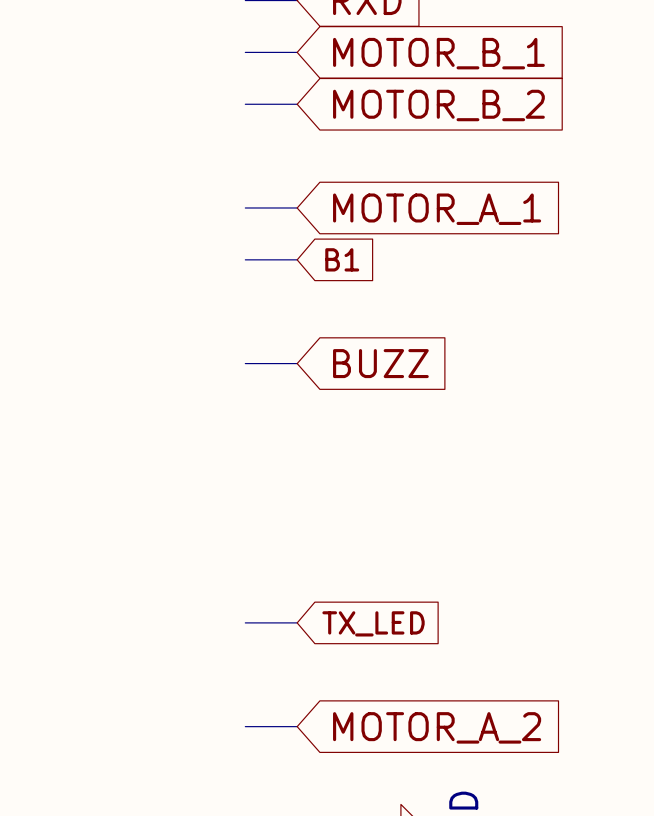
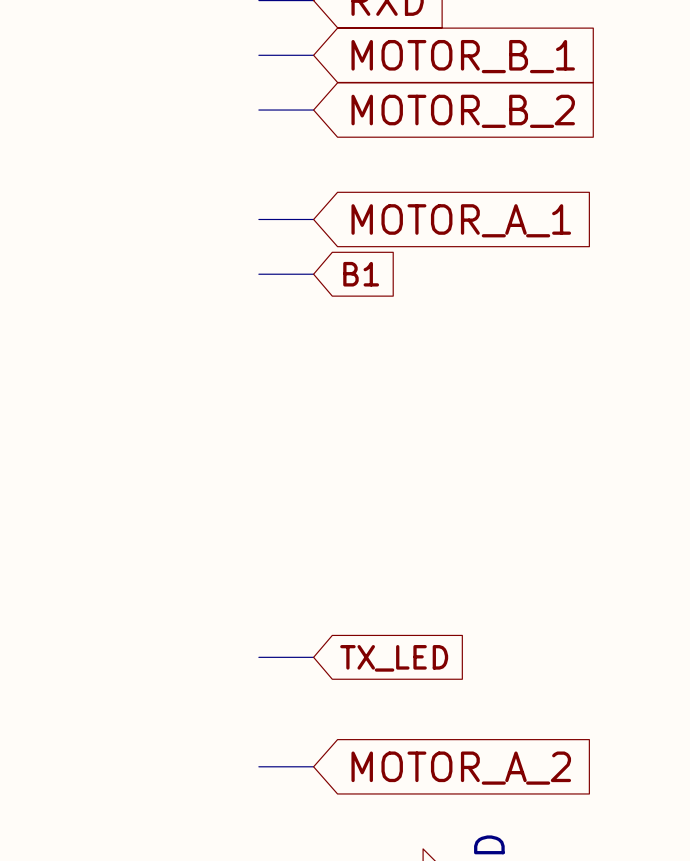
wire: (245, 363) (297, 363) -> none
global label: BUZZ (380, 363) -> none

